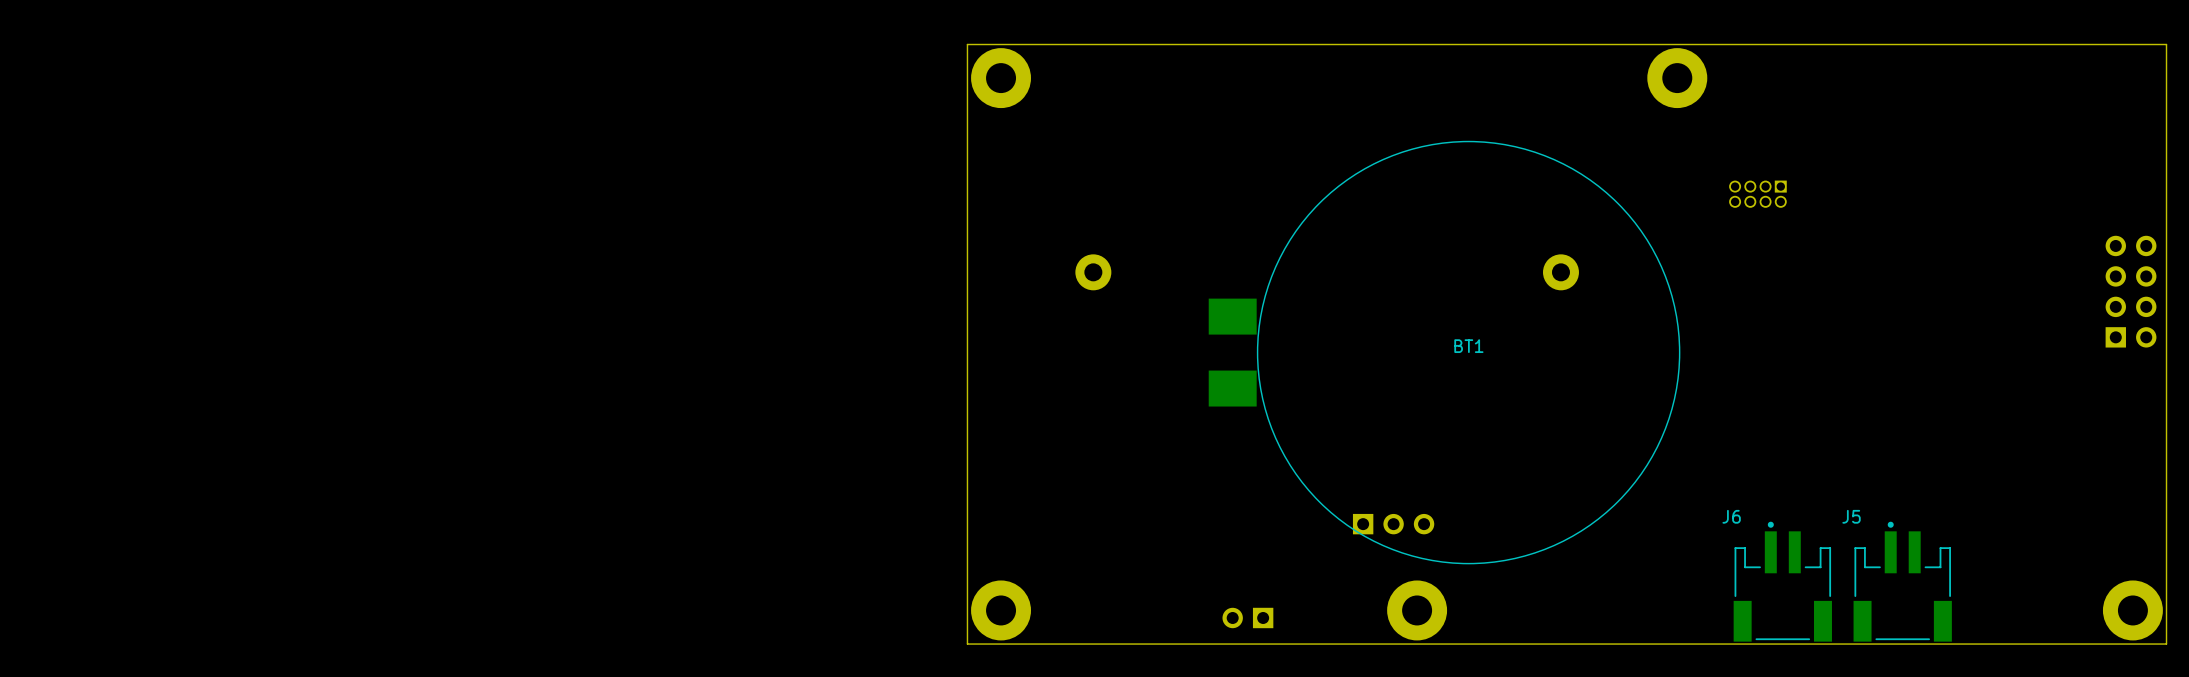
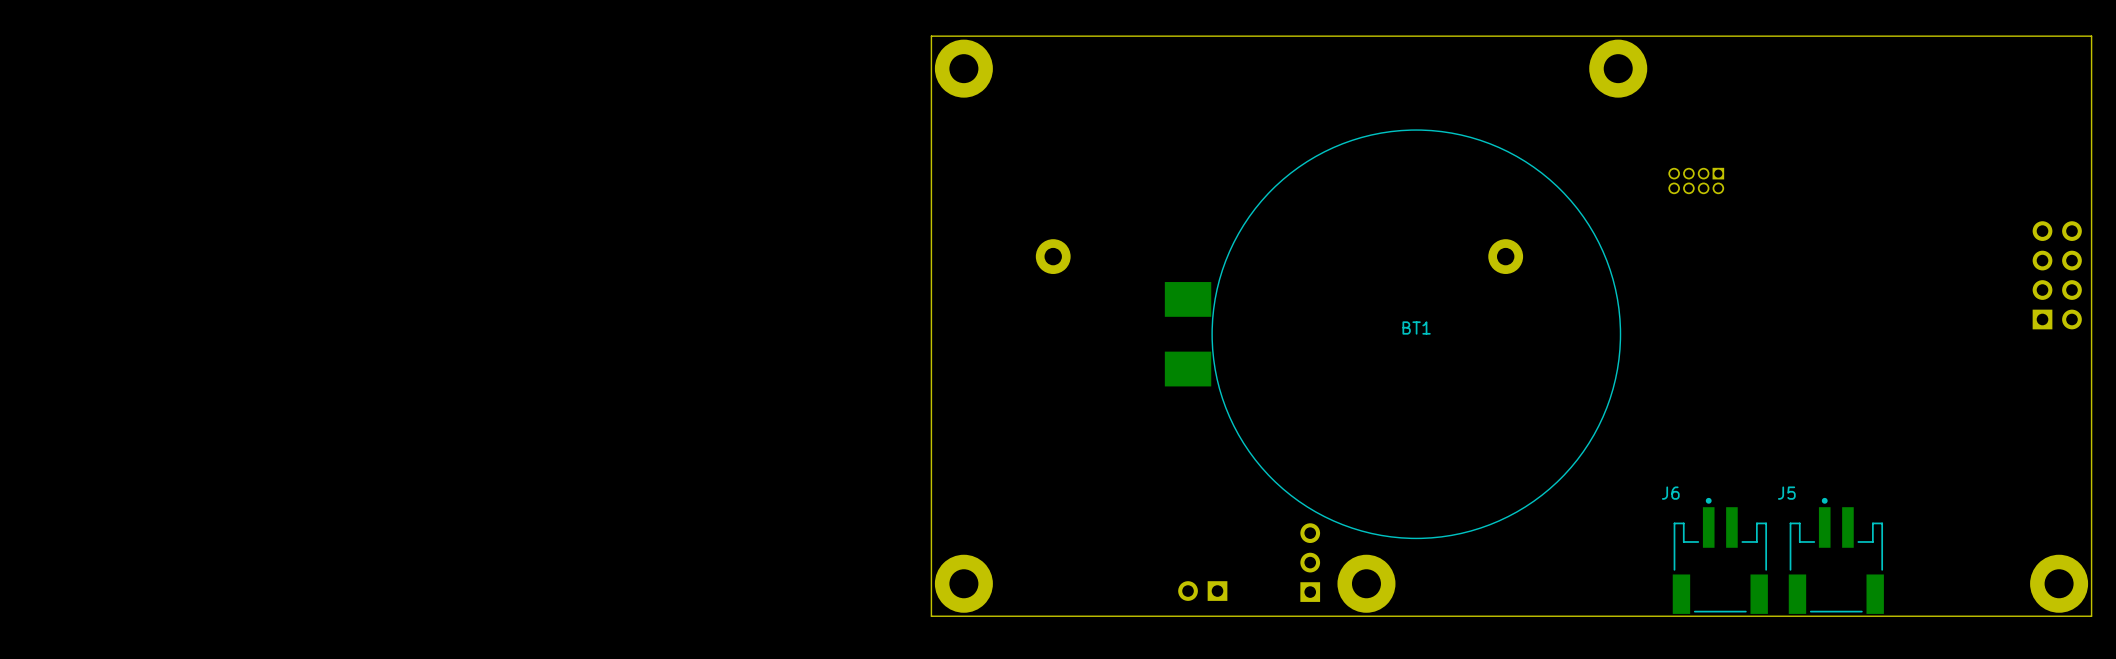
part rotation: 0° (1393, 524) -> 90° counterclockwise (1310, 562)
part position: (1393, 524) -> (1310, 562)

